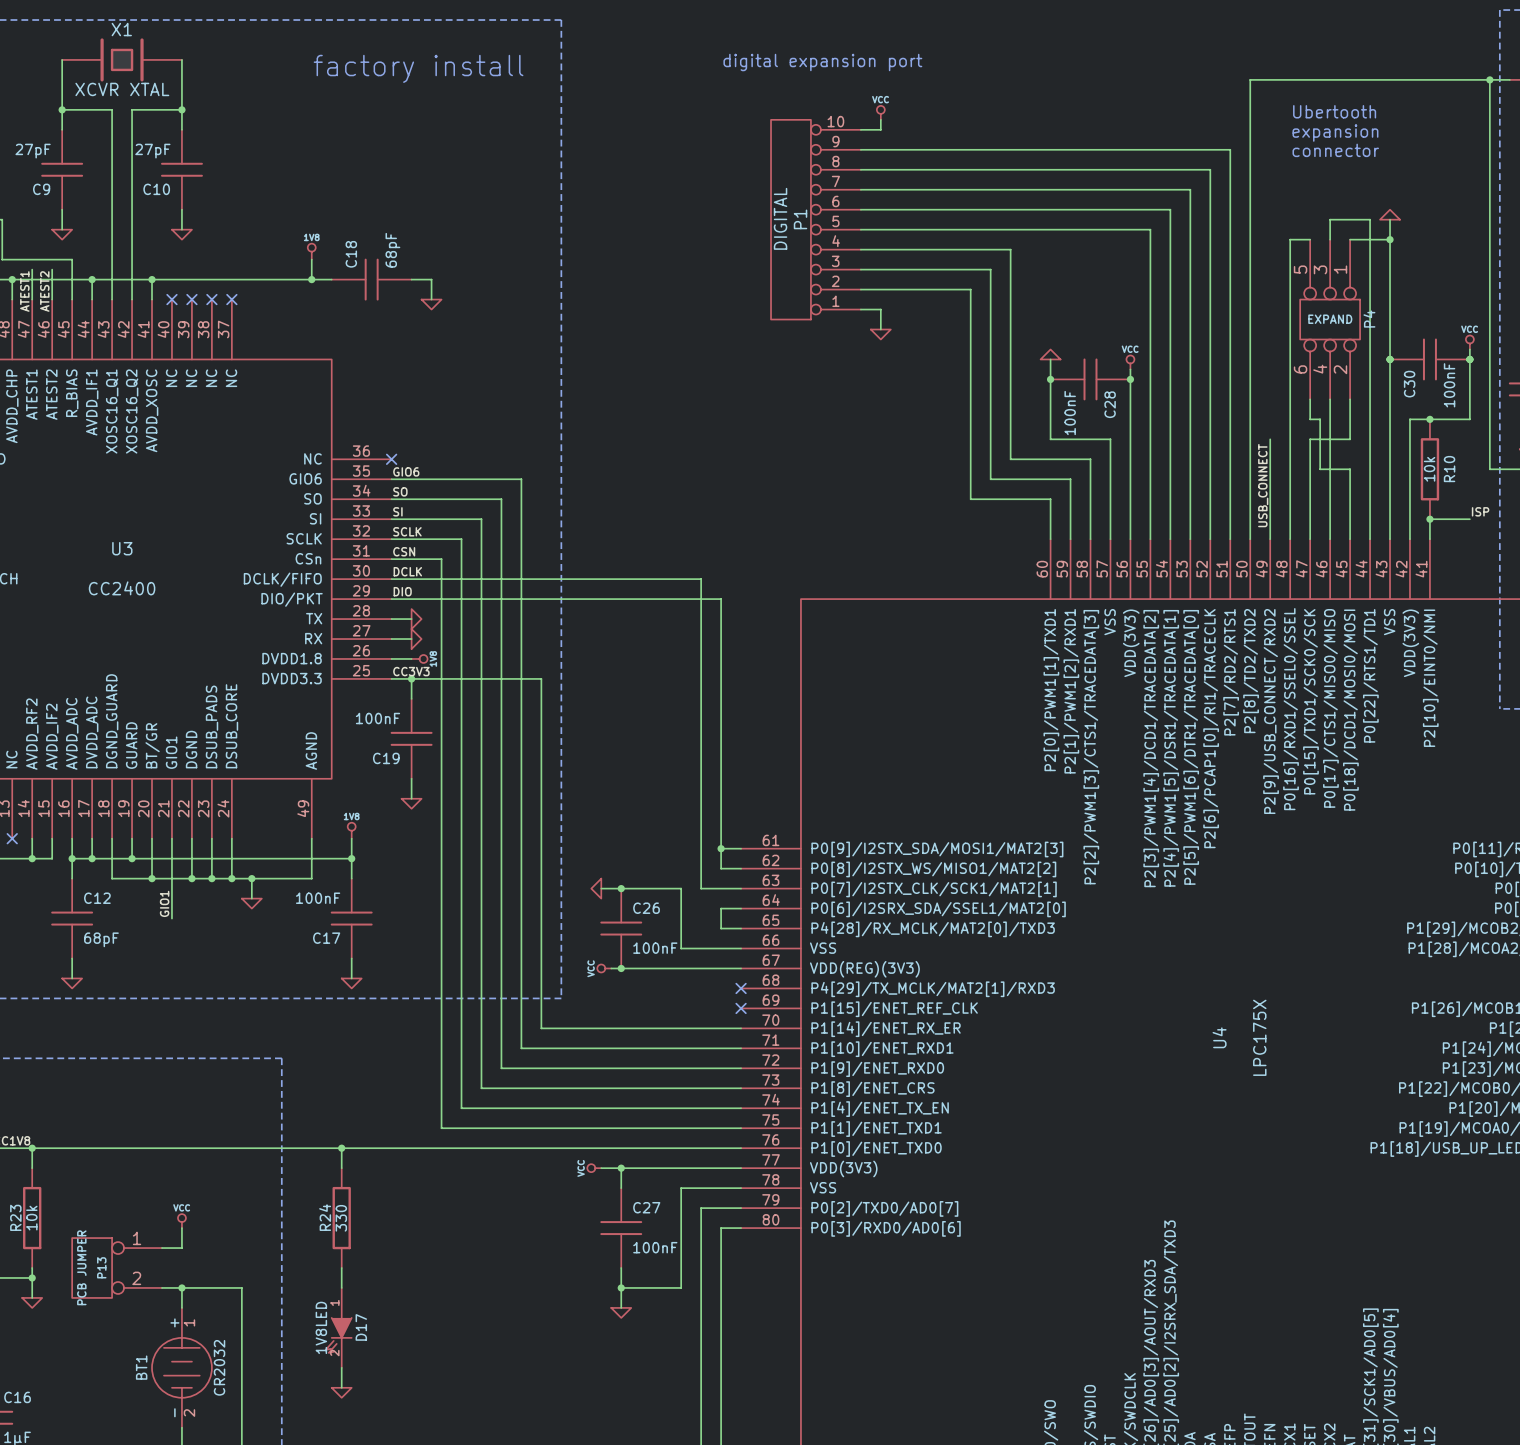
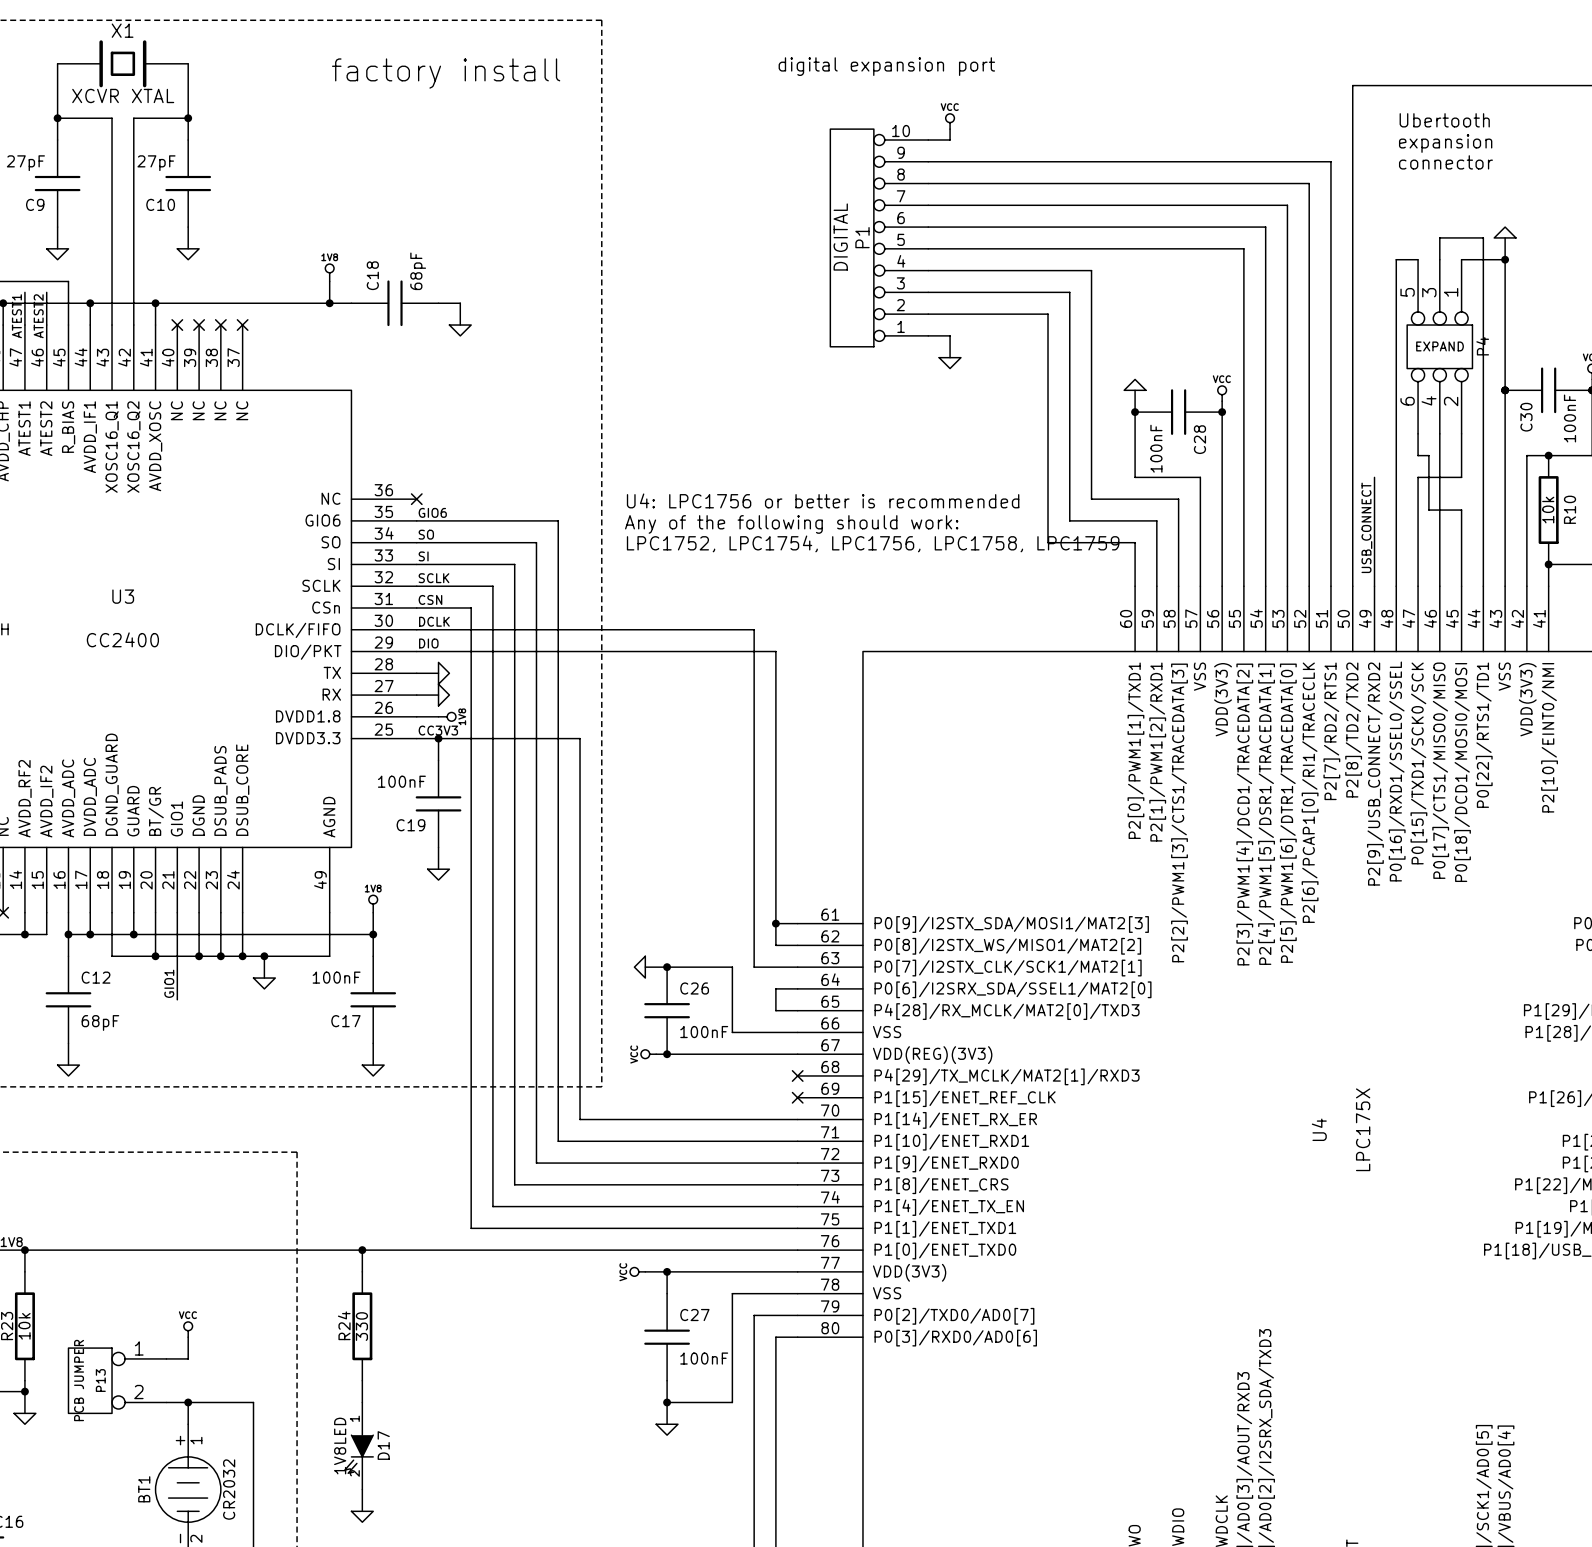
text: none -> U4: LPC1756 or better is recommended (823, 500)
text: none -> Any of the following should work: (791, 524)
text: none -> LPC1752, LPC1754, LPC1756, LPC1758, LPC1759 (873, 543)

